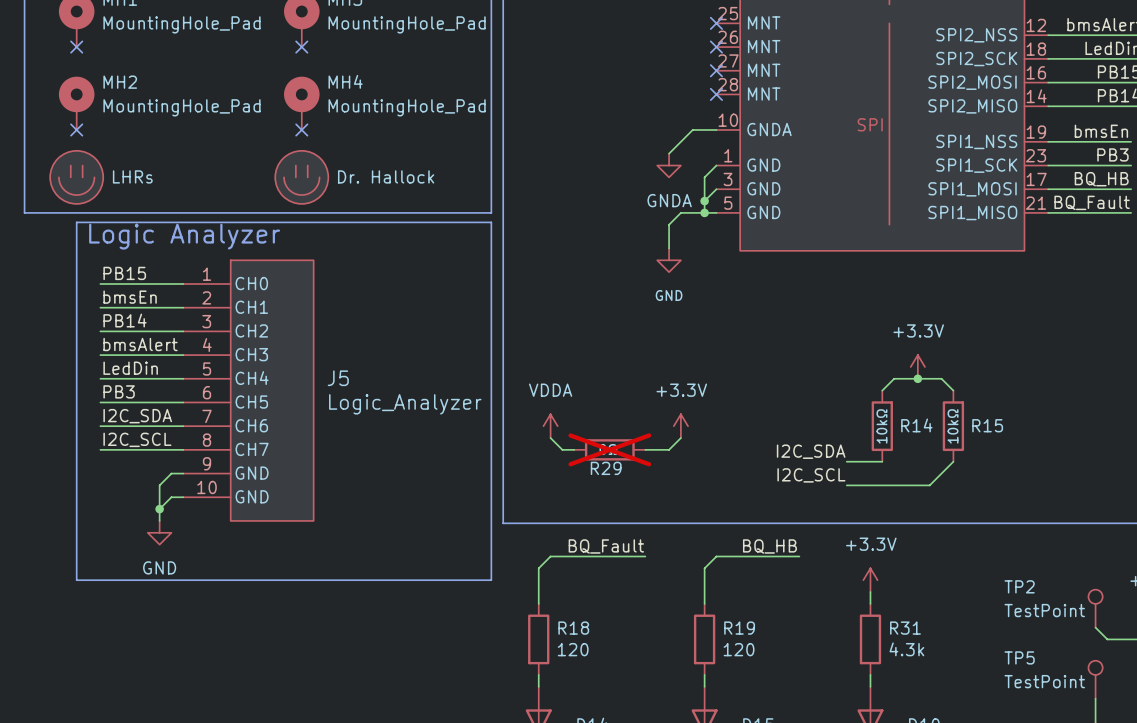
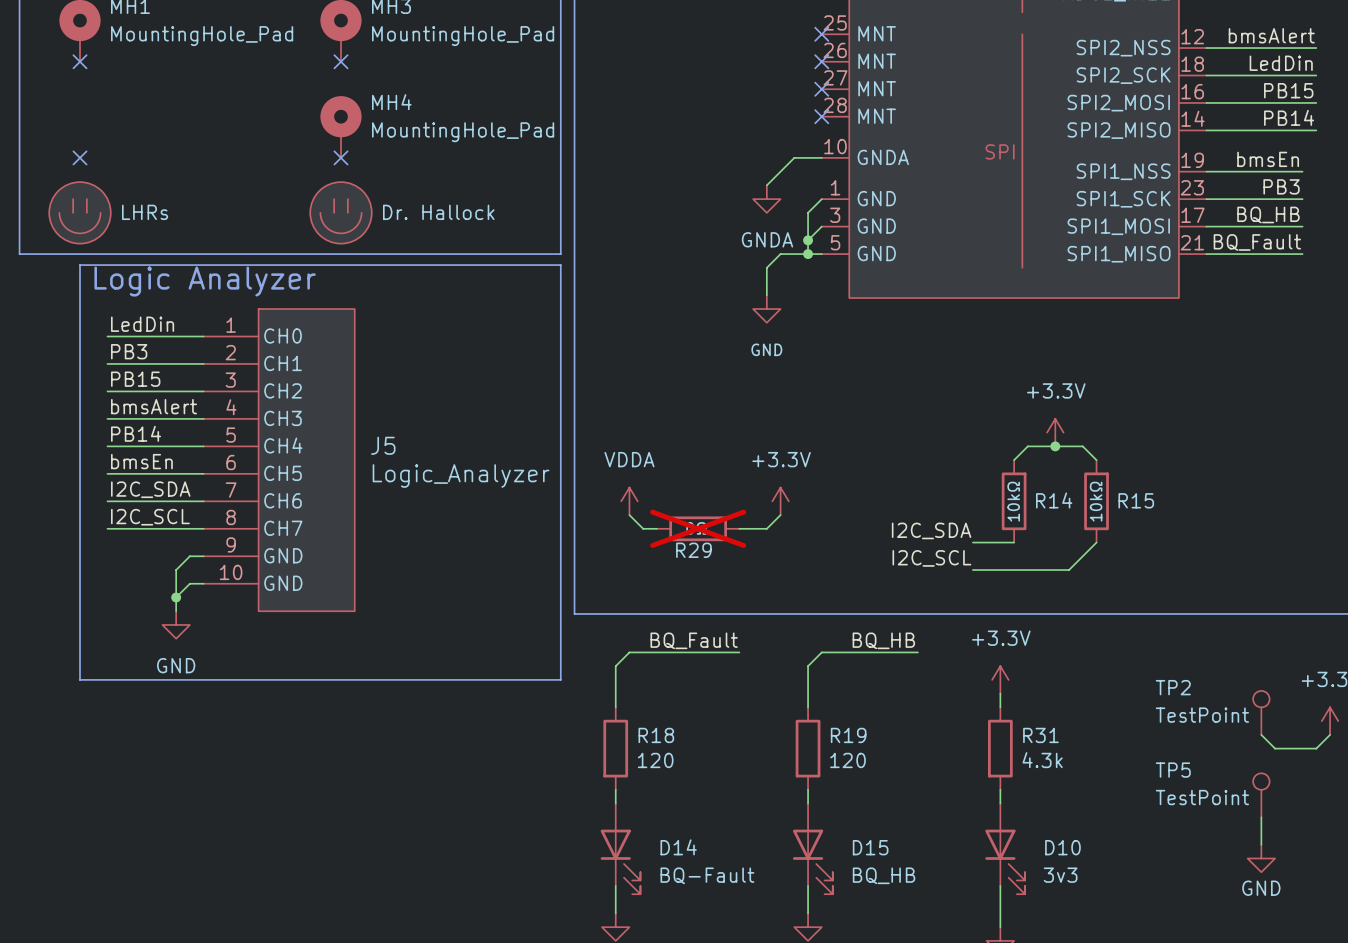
MH2: MountingHole_Pad (76, 103) -> none
label: PB15 (124, 273) -> LedDin (142, 324)
label: bmsEn (130, 297) -> PB3 (129, 351)
label: PB14 (125, 320) -> PB15 (135, 379)
label: LedDin (130, 368) -> PB14 (136, 433)
label: PB3 (119, 391) -> bmsEn (141, 461)

